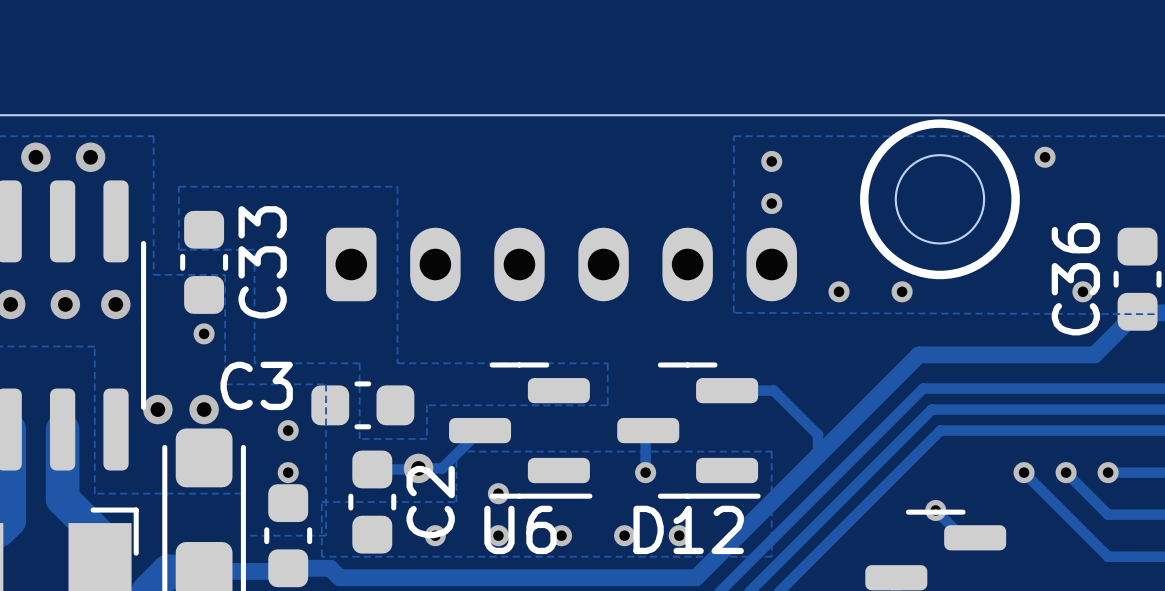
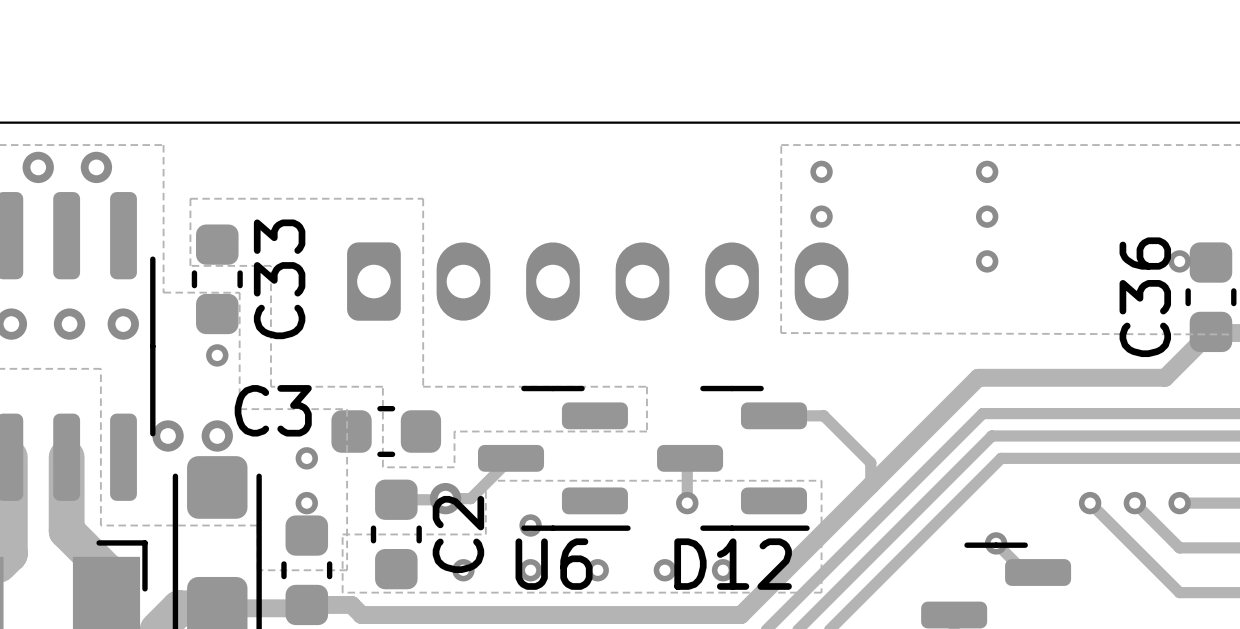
drawing: [860, 119, 1020, 280] -> none
round board edge: [894, 154, 986, 245] -> none
via: (1045, 157) -> none
via: none -> (987, 171)
via: none -> (987, 216)
via: none -> (987, 261)
via: (839, 291) -> none
via: (902, 291) -> none
via position: (1082, 291) -> (1179, 261)

